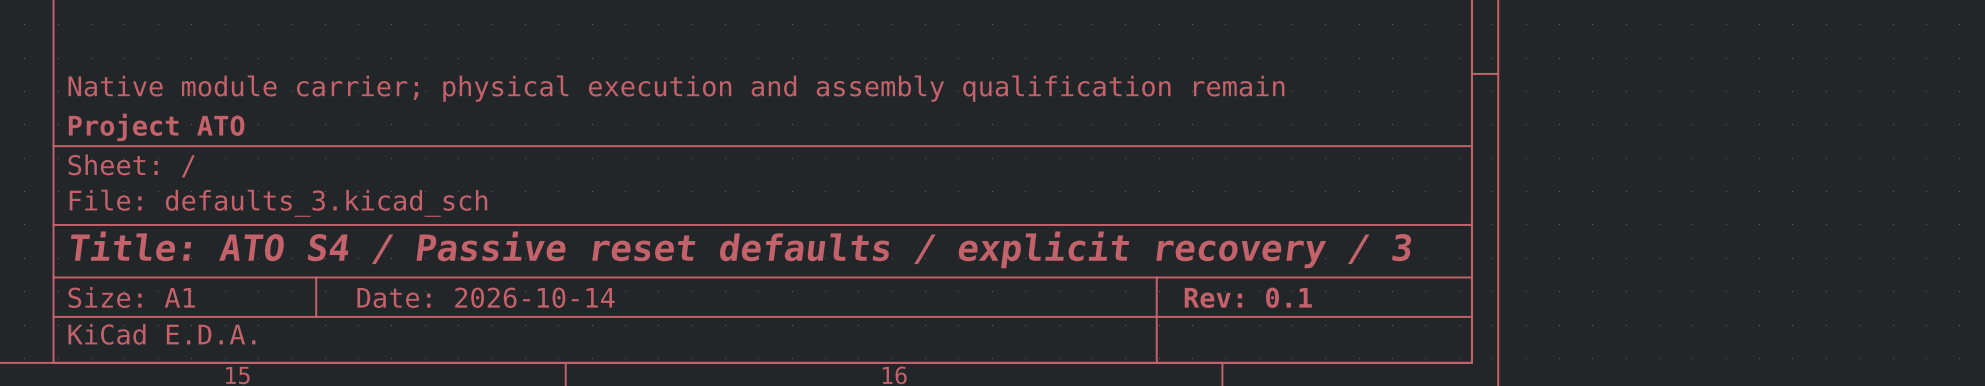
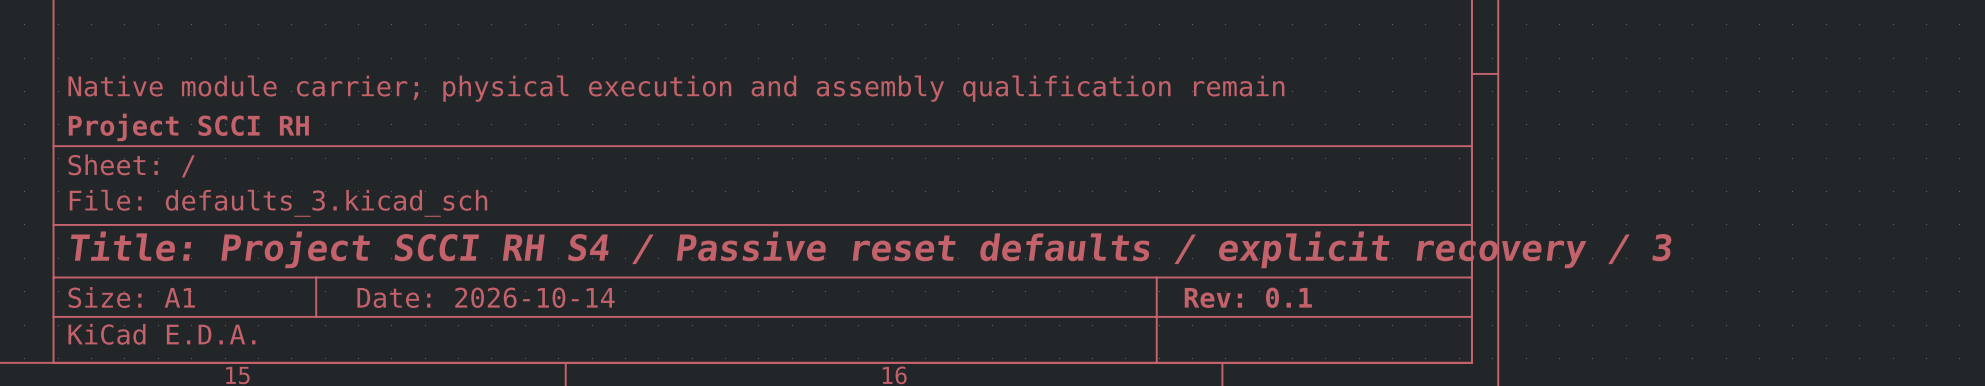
title block: Project ATO (156, 127) -> Project SCCI RH (188, 127)
title block: Title: ATO S4 / Passive reset defaults / explicit recovery / 3 (741, 249) -> Title: Project SCCI RH S4 / Passive reset defaults / explicit recovery / 3 (871, 249)

